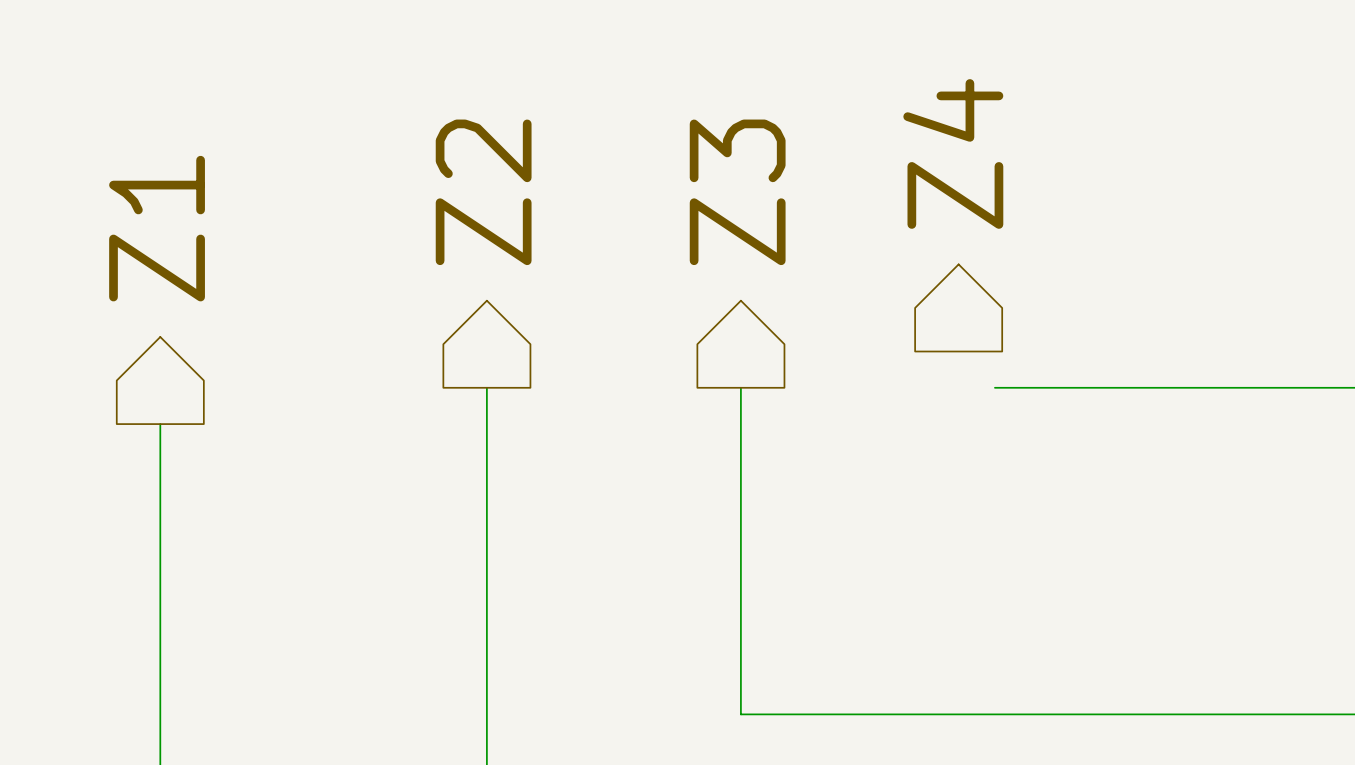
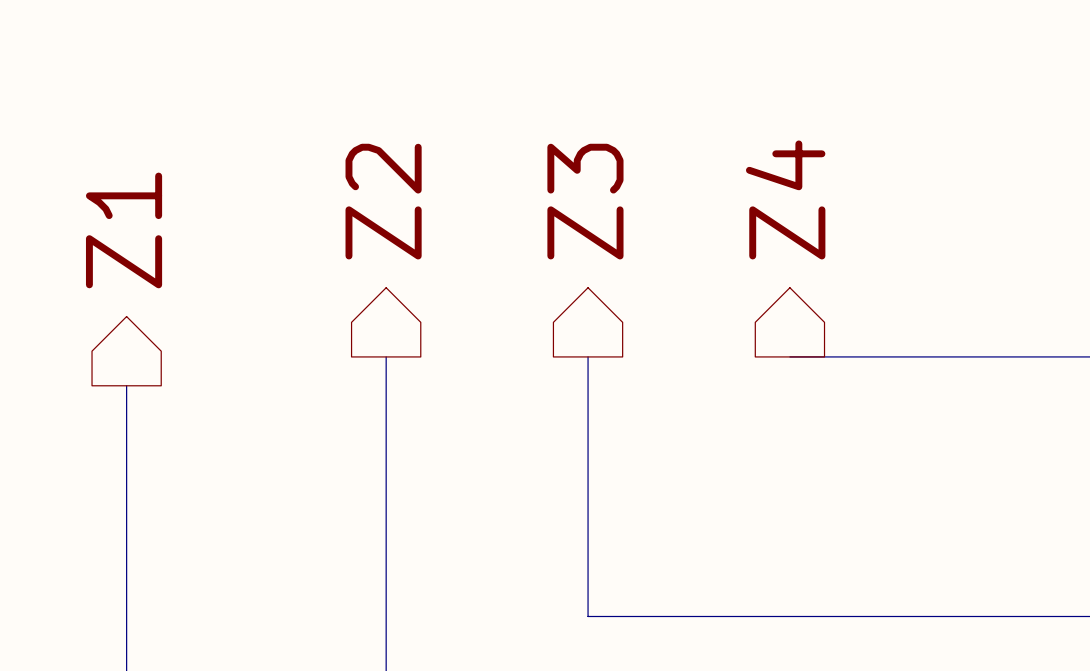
hierarchical label position: Z4 (953, 153) -> Z4 (785, 199)

